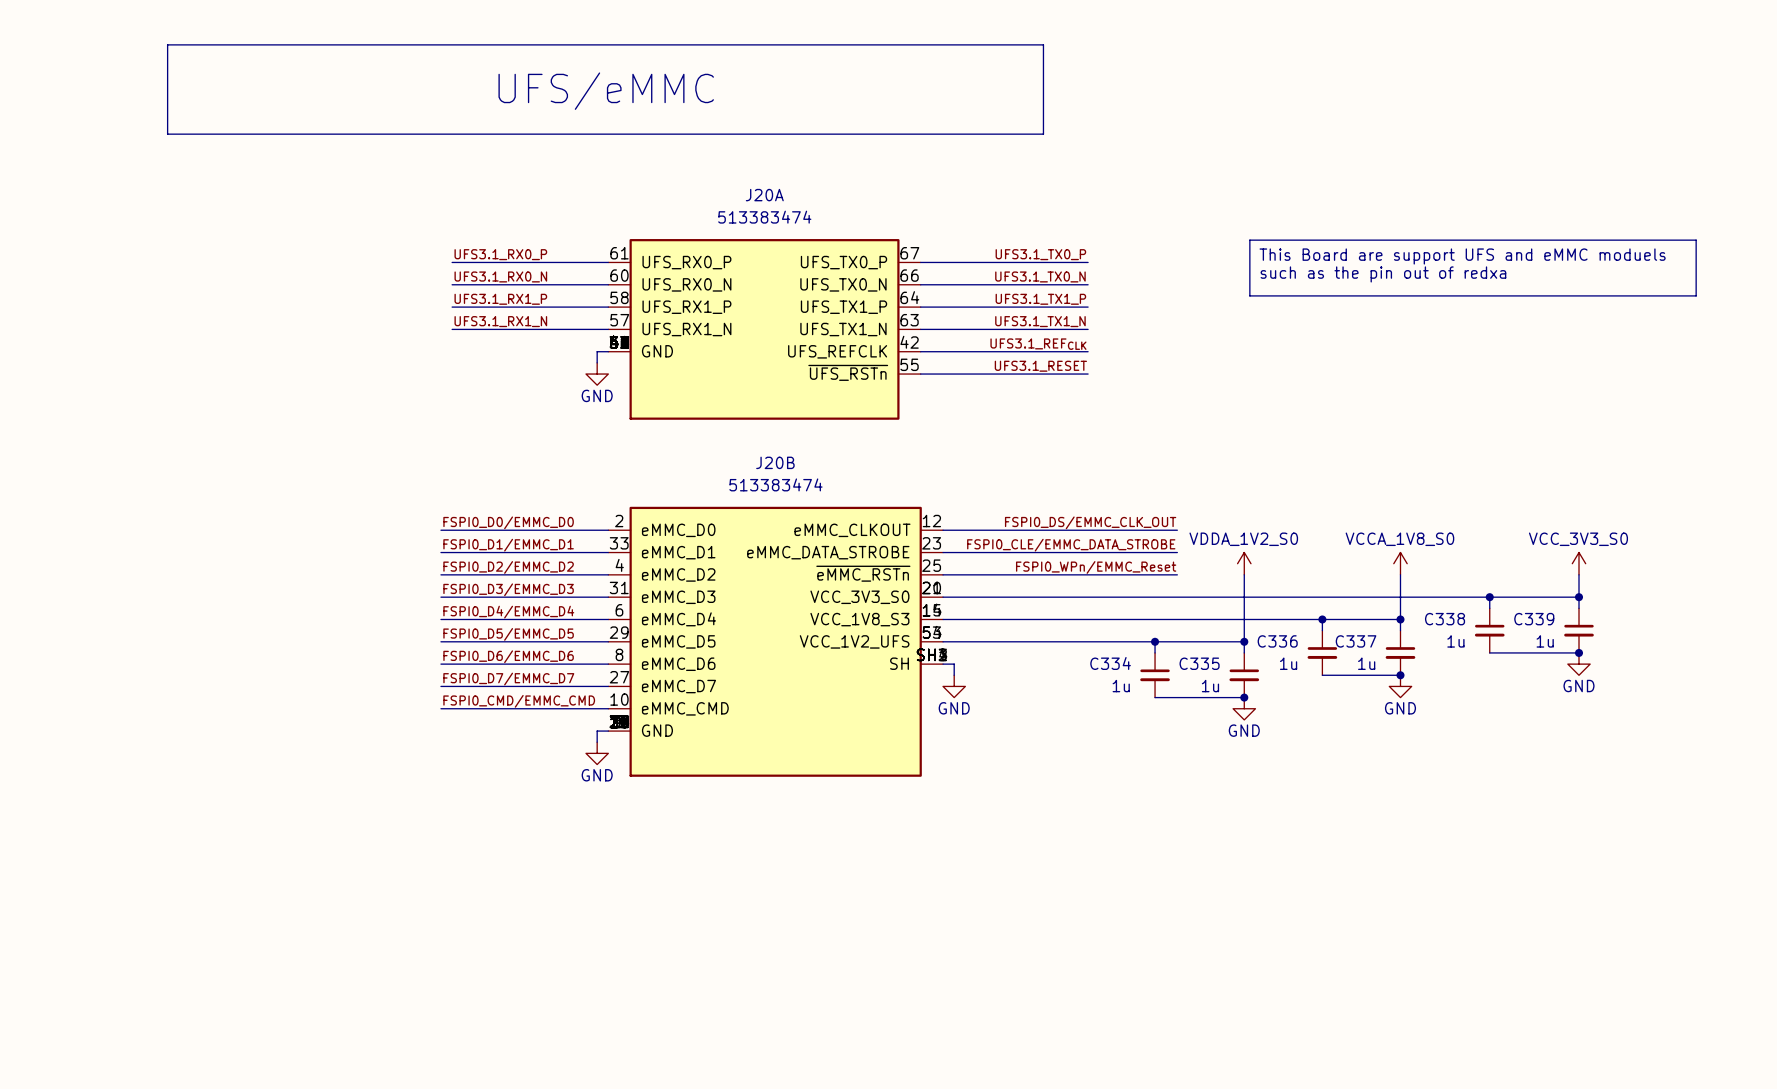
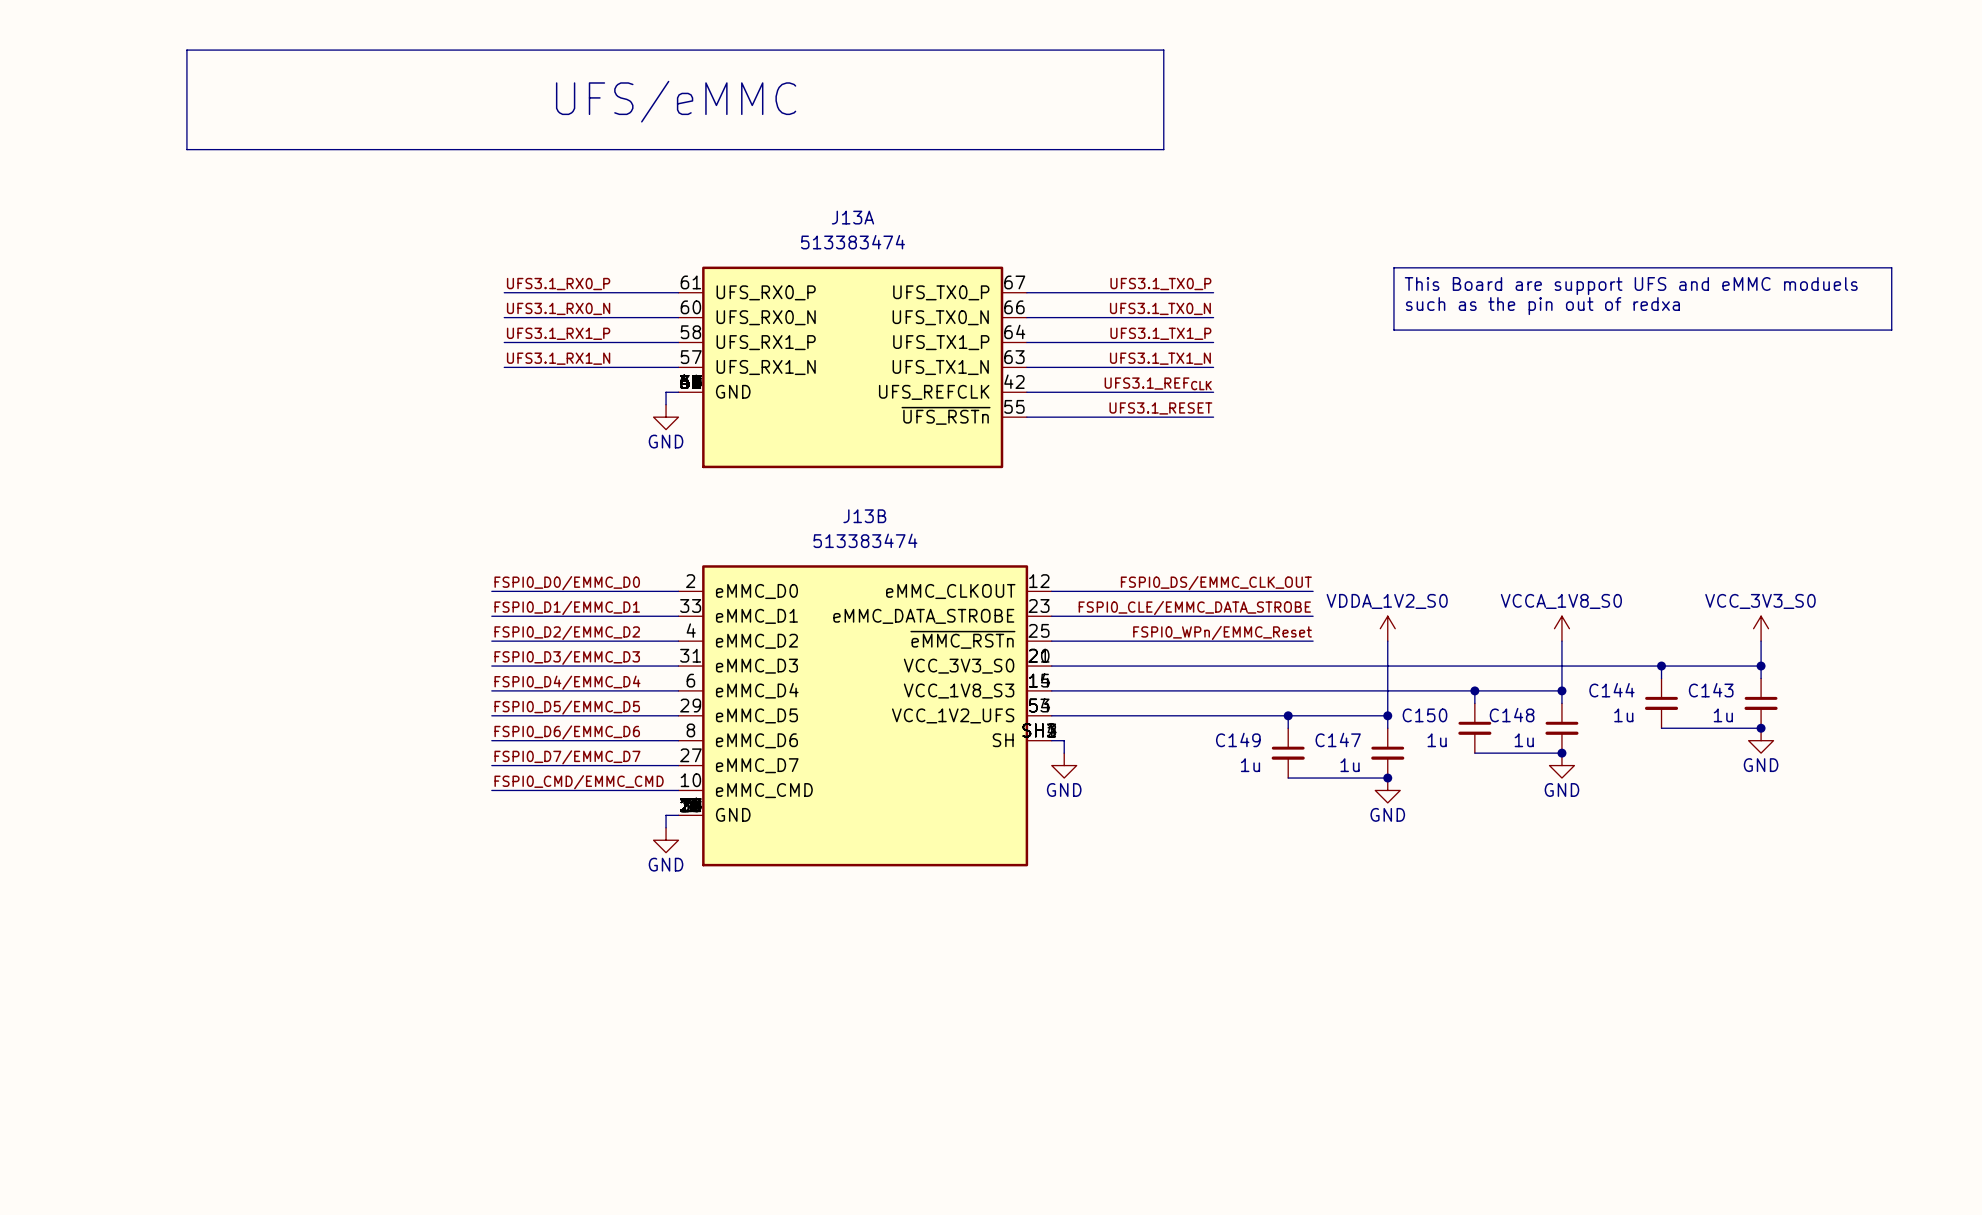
J20A name: J20A (764, 195) -> J13A (852, 217)
J20B name: J20B (775, 462) -> J13B (864, 516)
C338 name: C338 (1445, 619) -> C144 (1611, 690)
C339 name: C339 (1534, 619) -> C143 (1711, 690)
C336 name: C336 (1277, 641) -> C150 (1424, 715)
C337 name: C337 (1356, 641) -> C148 (1512, 715)
C334 name: C334 (1110, 663) -> C149 (1238, 739)
C335 name: C335 (1199, 663) -> C147 (1338, 739)

